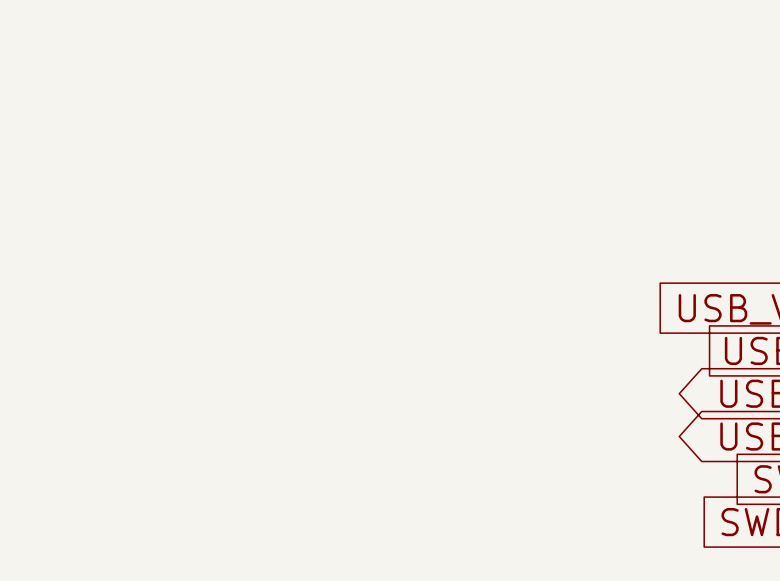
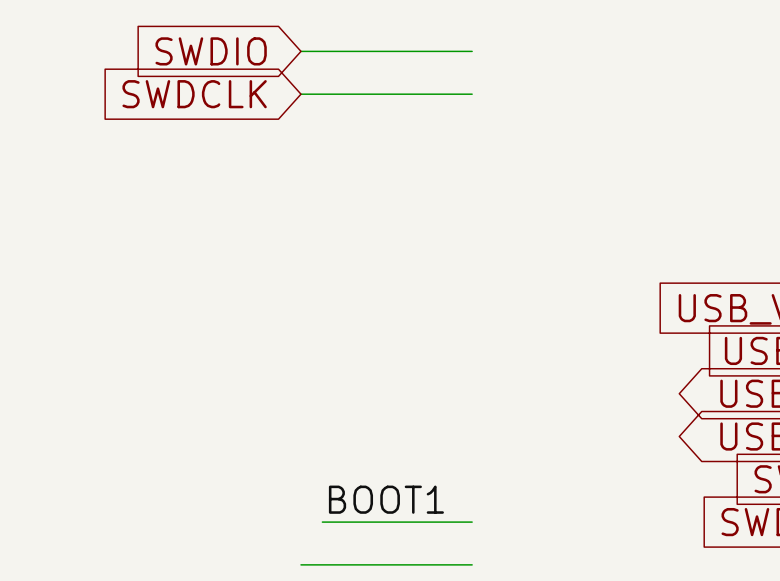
global label: none -> SWDIO (211, 51)
wire: none -> (300, 51) (472, 51)
global label: none -> SWDCLK (194, 94)
wire: none -> (300, 94) (472, 94)
label: none -> BOOT1 (386, 499)
wire: none -> (322, 522) (472, 522)
wire: none -> (300, 564) (472, 564)

